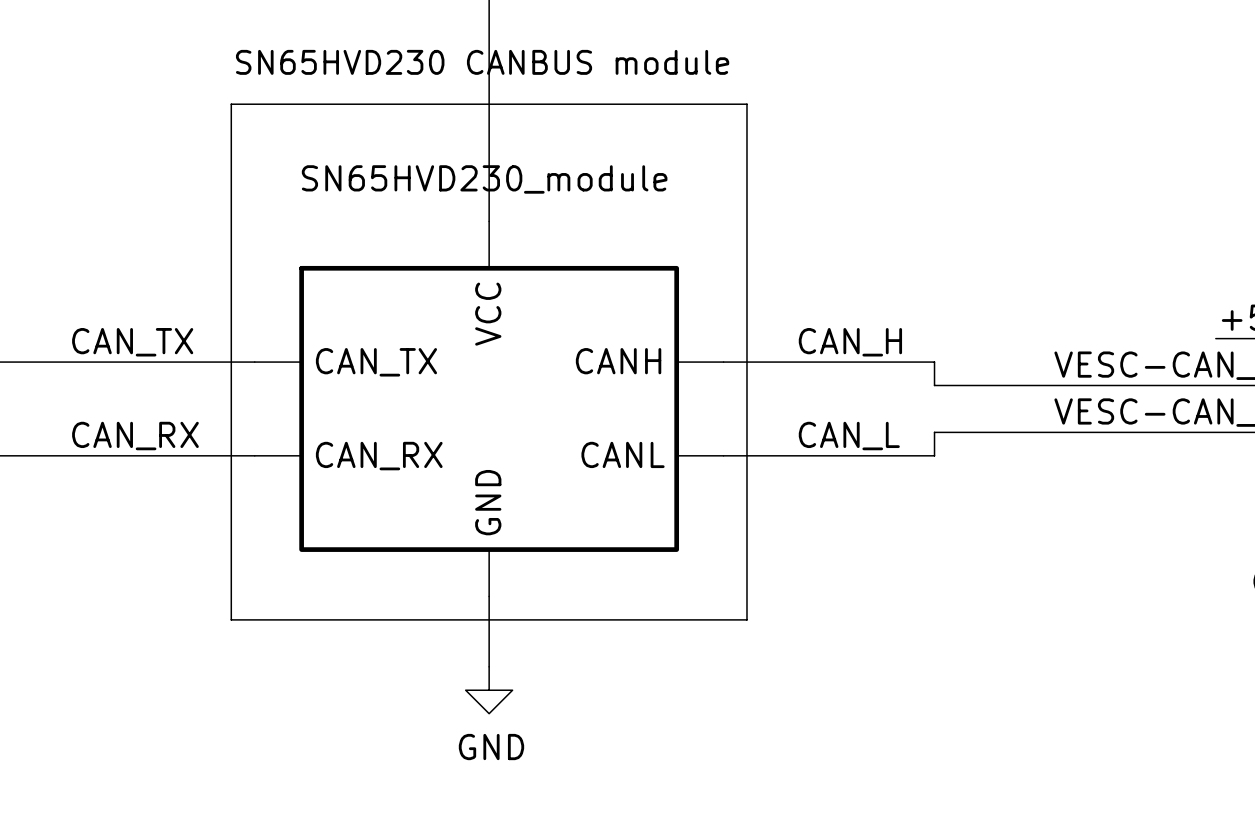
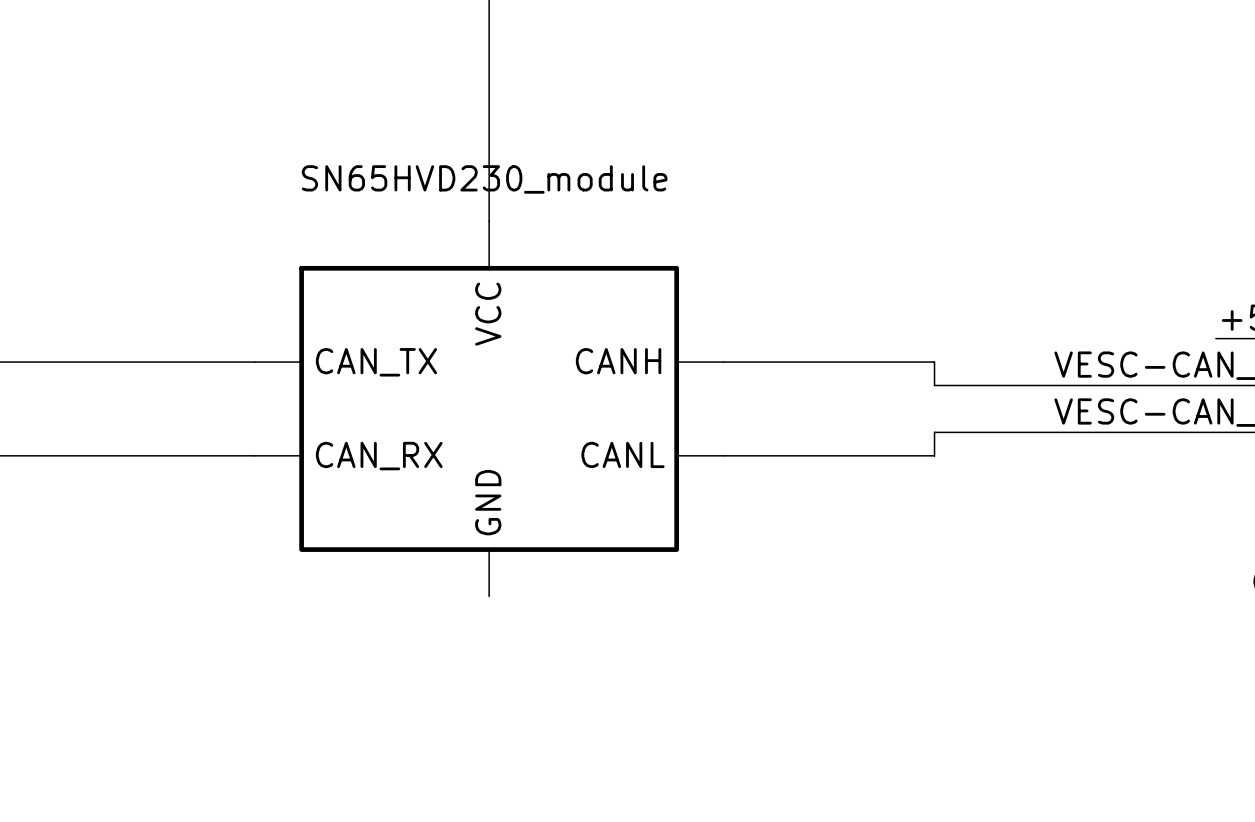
text: SN65HVD230 CANBUS module (482, 62) -> none
line: (231, 104) (231, 619) (746, 619) (746, 104) (231, 104) -> none
label: CAN_TX (132, 342) -> none
label: CAN_H (850, 342) -> none
label: CAN_RX (135, 436) -> none
label: CAN_L (849, 436) -> none
wire: (489, 596) (489, 666) -> none
power symbol: GND (489, 690) -> none

